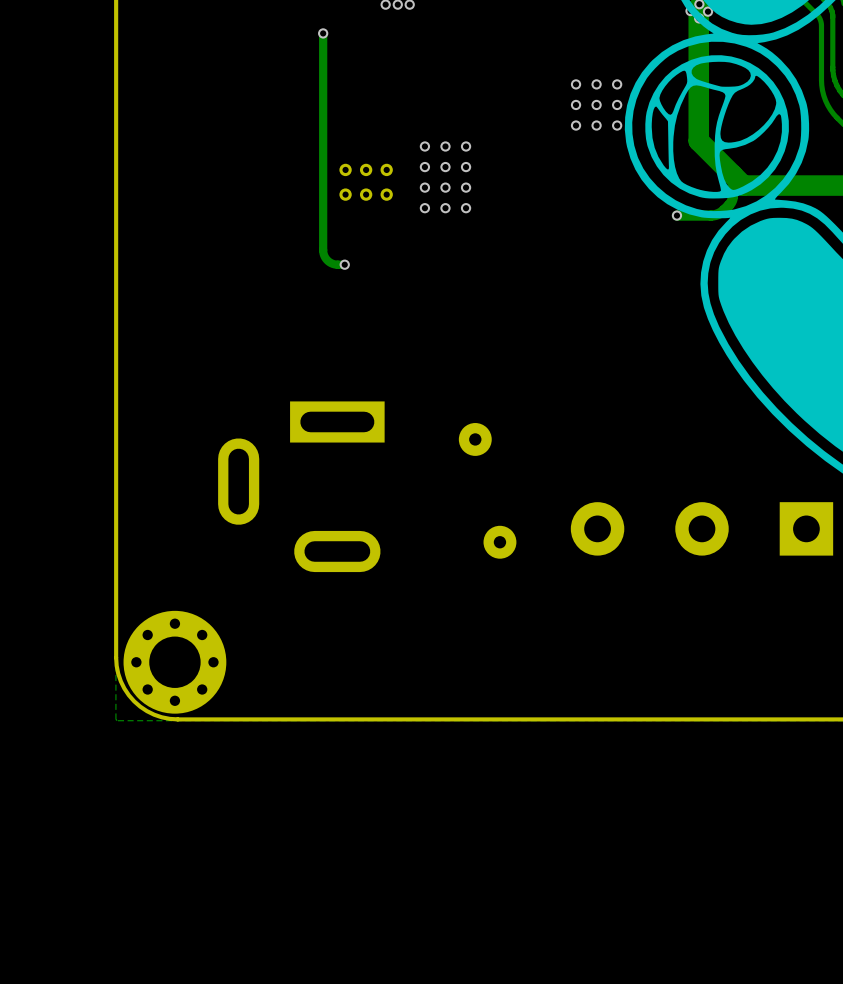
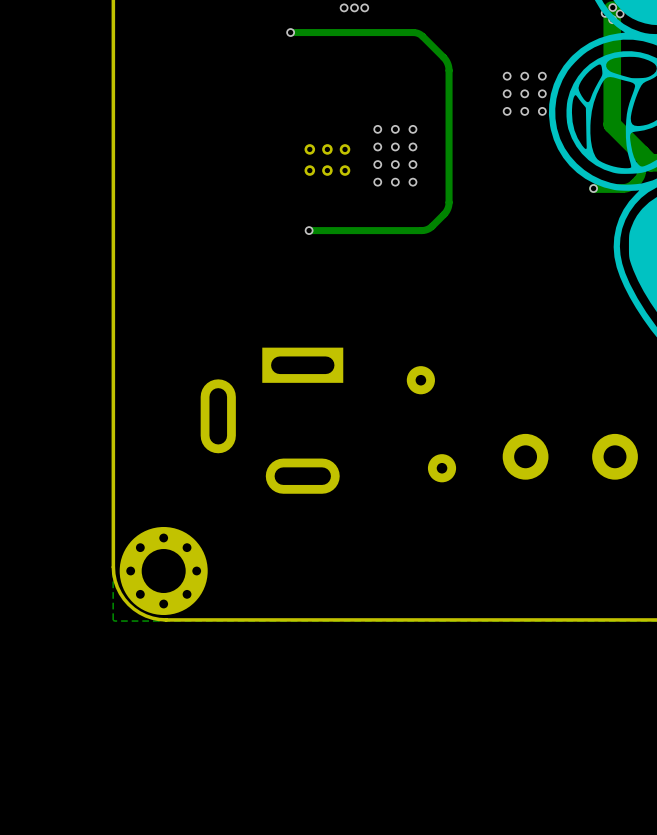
track: (323, 33) (323, 251) (329, 262) (344, 264) -> (290, 32) (415, 32) (421, 35) (443, 57) (448, 68) (449, 202) (445, 213) (430, 227) (423, 230) (309, 230)

